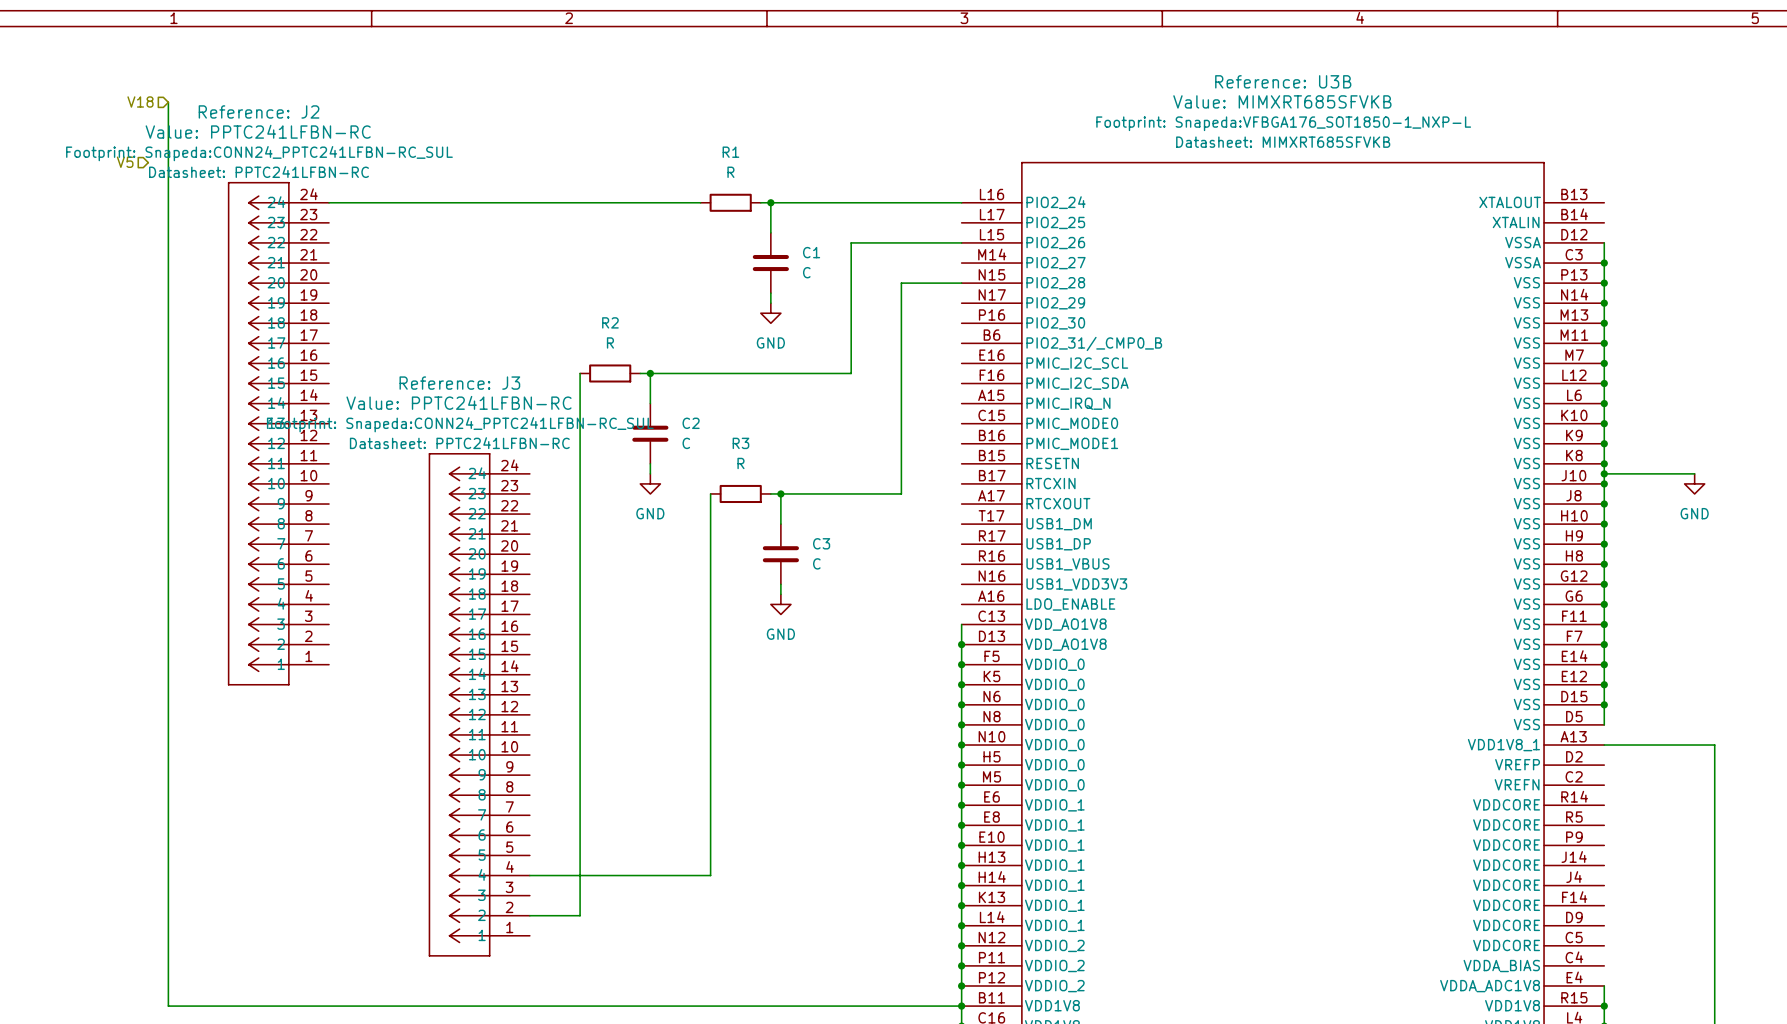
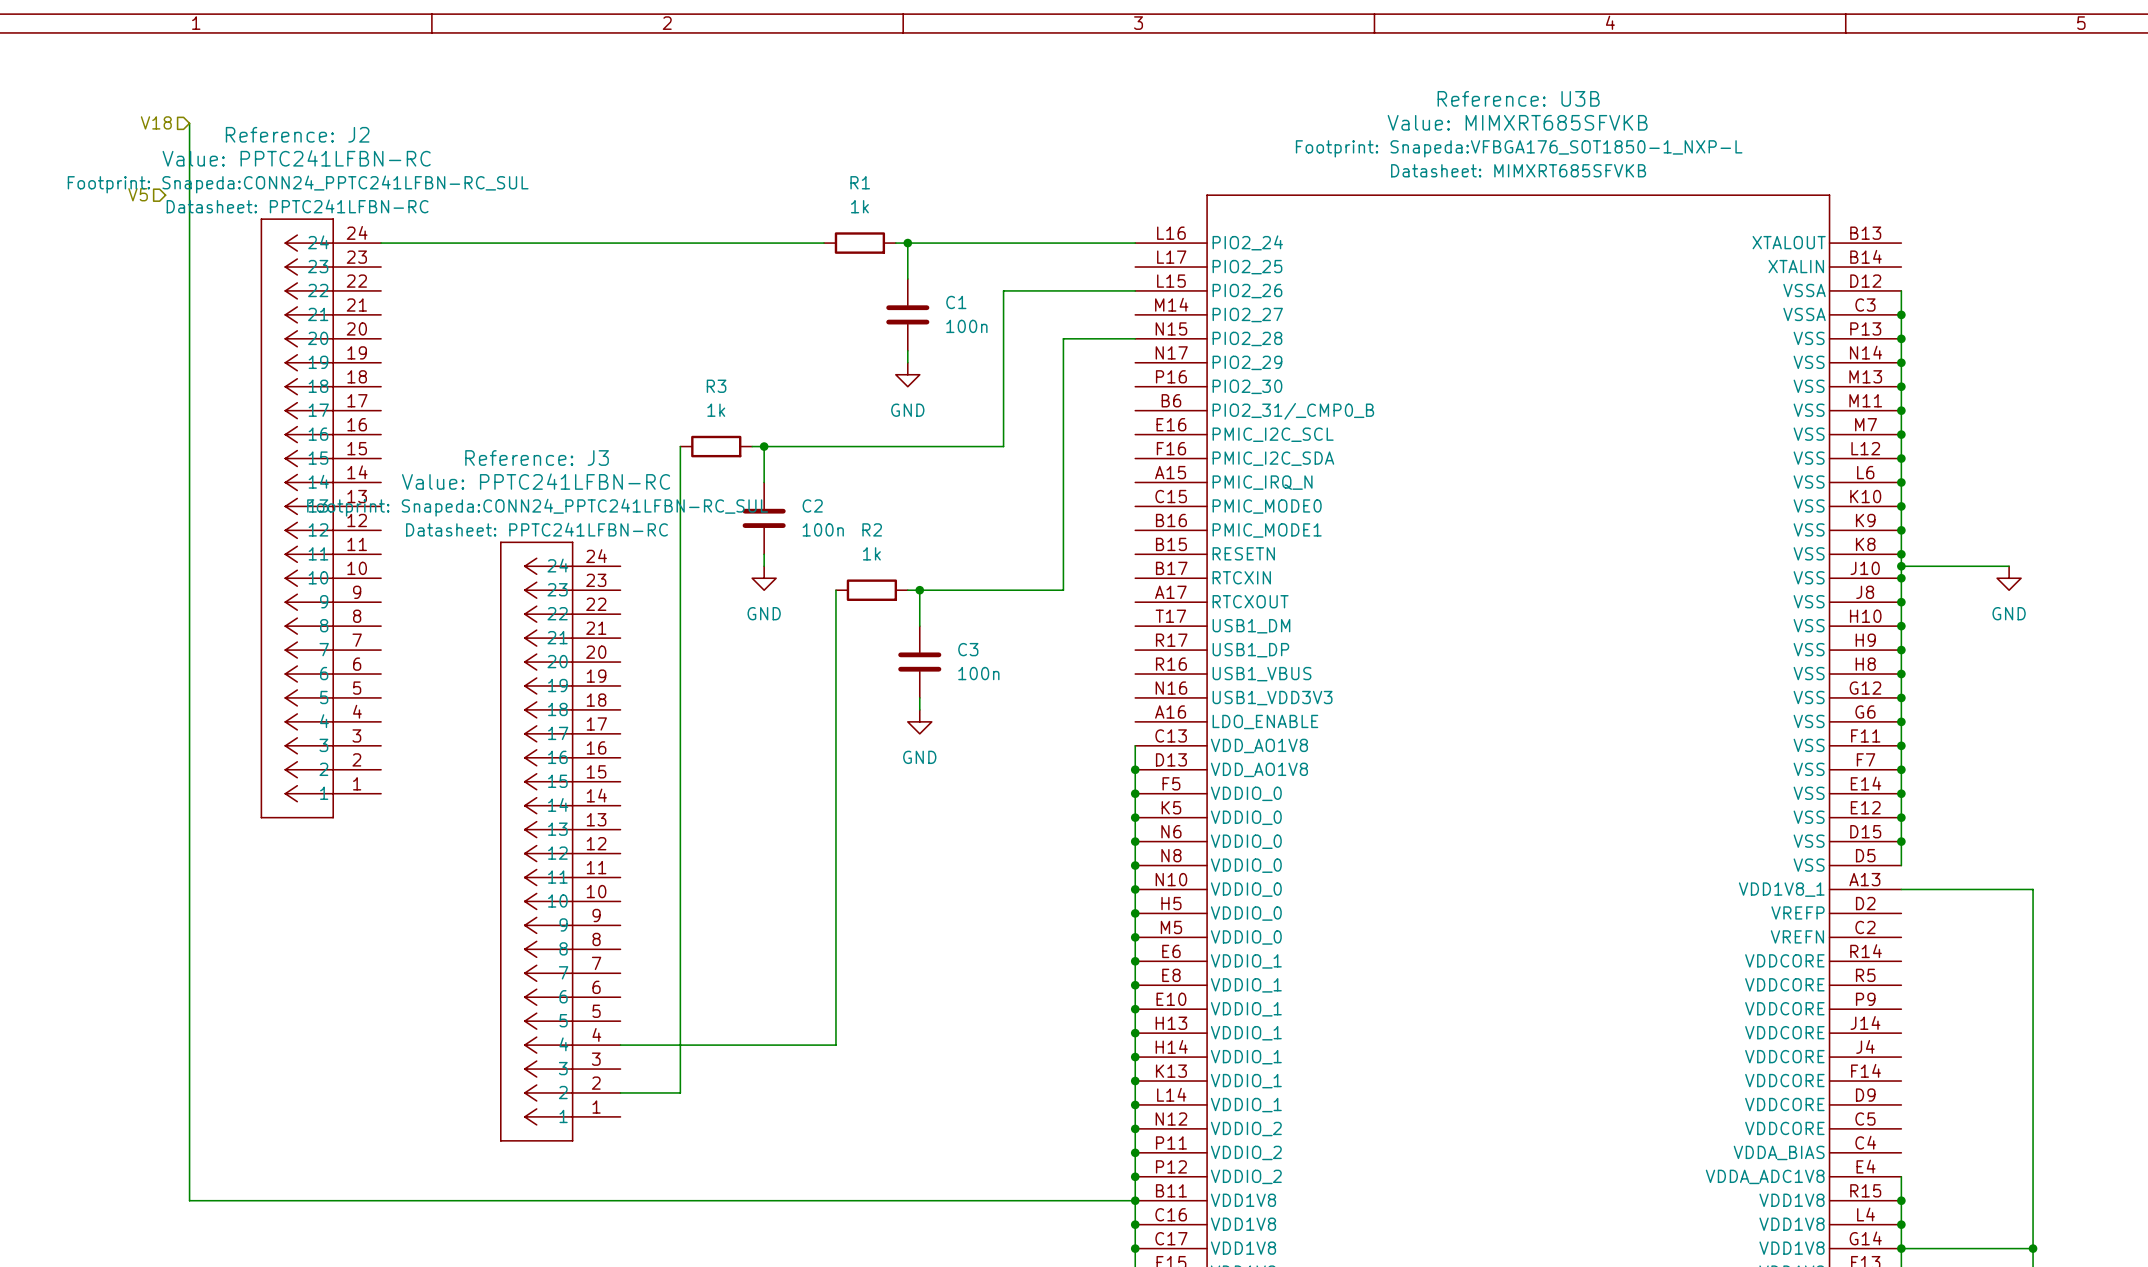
R1 value: R (730, 172) -> 1k (859, 206)
C1 value: C (806, 272) -> 100n (966, 326)
R2 name: R2 (610, 322) -> R3 (716, 386)
R2 value: R (610, 342) -> 1k (716, 410)
C2 value: C (686, 443) -> 100n (823, 529)
R3 name: R3 (740, 443) -> R2 (872, 529)
R3 value: R (740, 463) -> 1k (871, 553)
C3 value: C (816, 563) -> 100n (978, 673)

